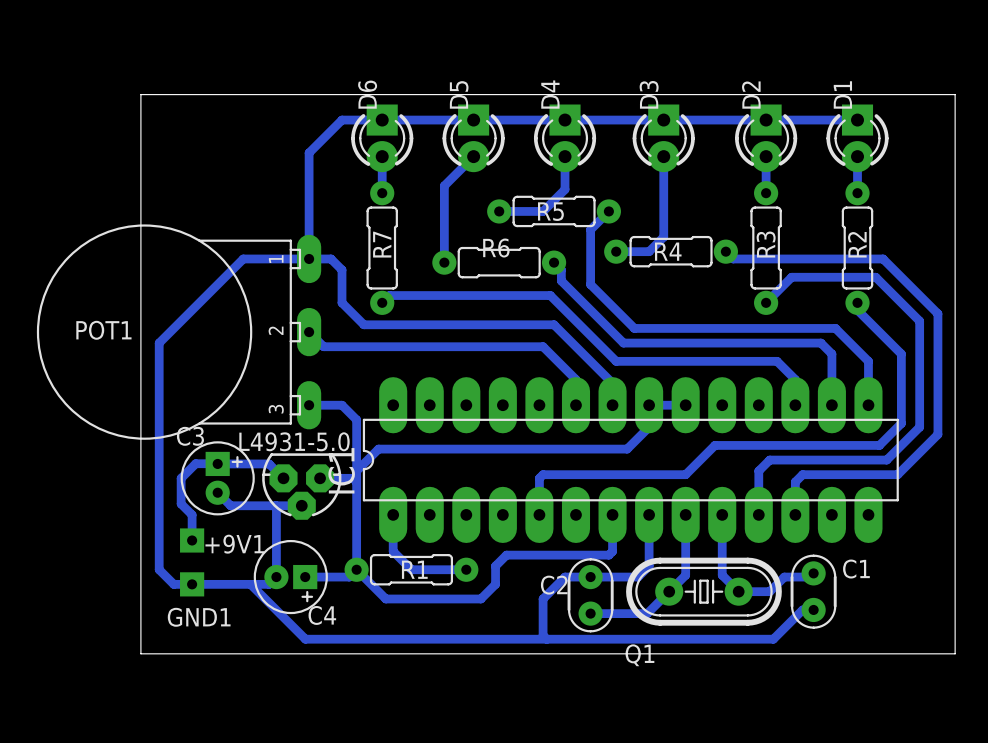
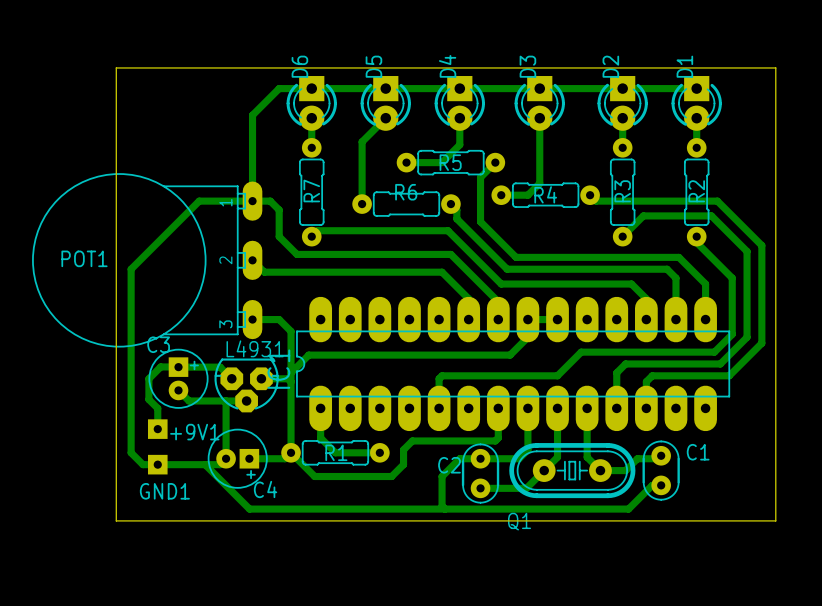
L4931-5.0 name: L4931-5.0 (294, 441) -> L4931 (255, 348)

